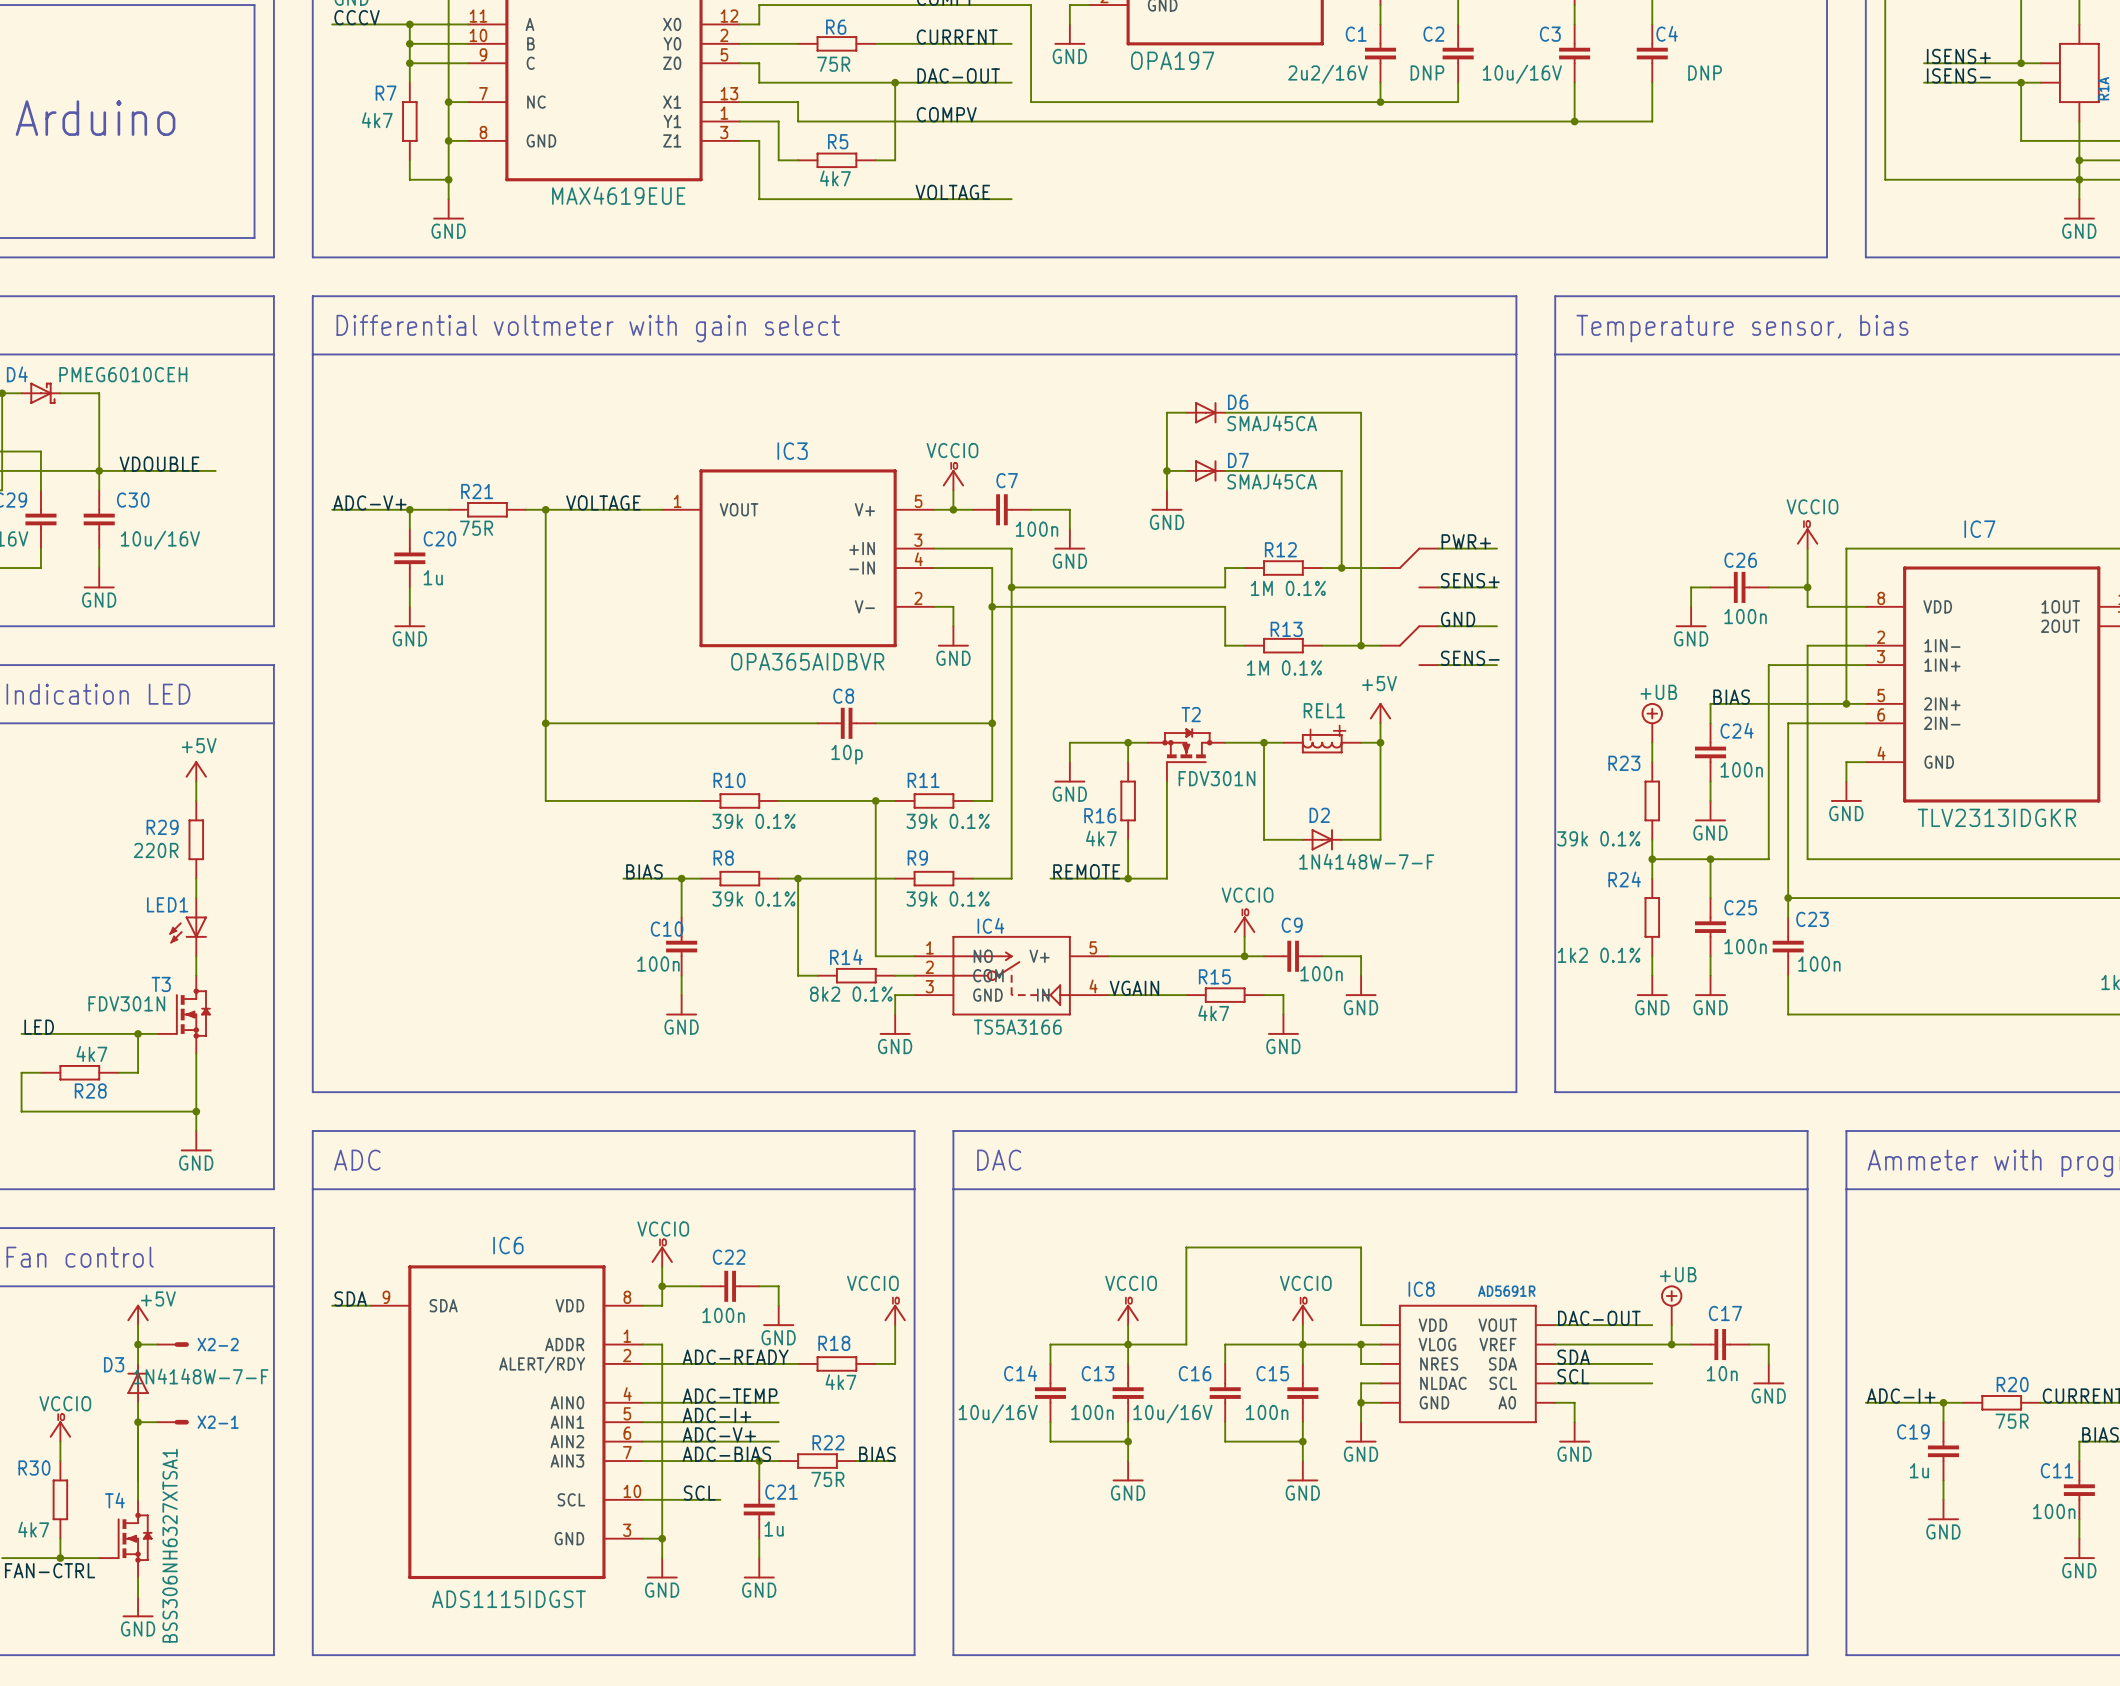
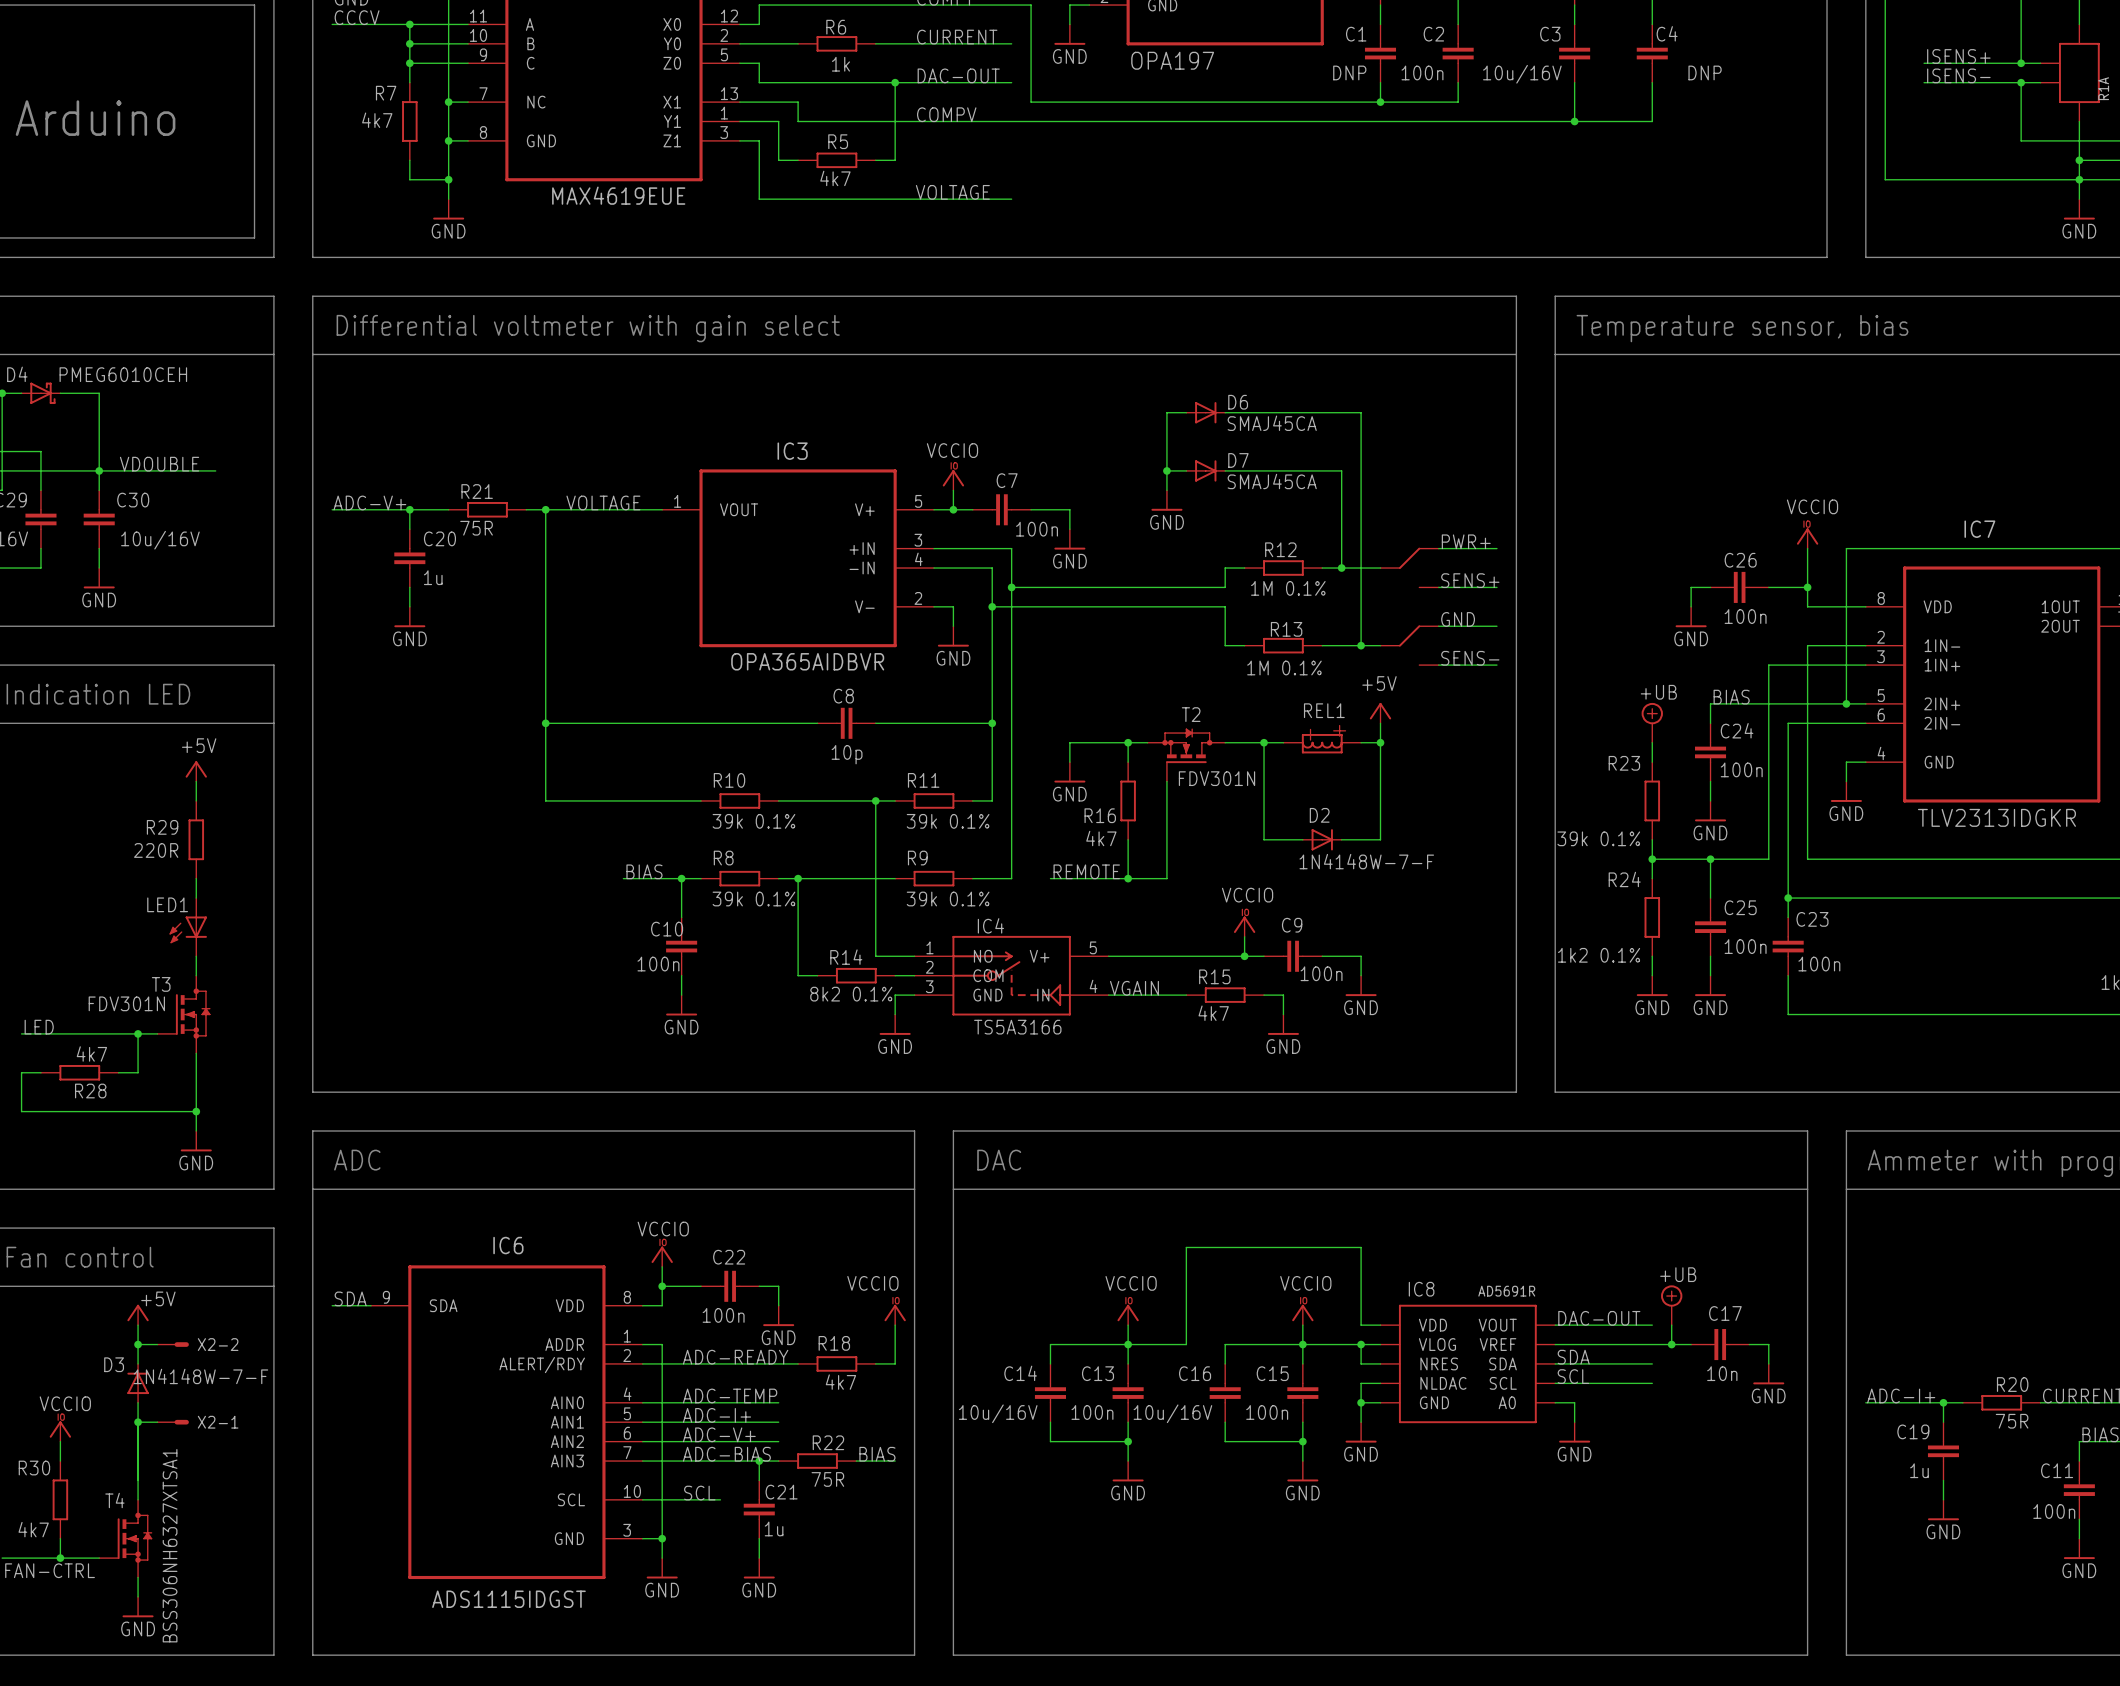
R6 value: 75R (833, 64) -> 1k (840, 64)
C2 value: DNP (1427, 72) -> 100n (1422, 72)
C1 value: 2u2/16V (1327, 74) -> DNP (1349, 72)

